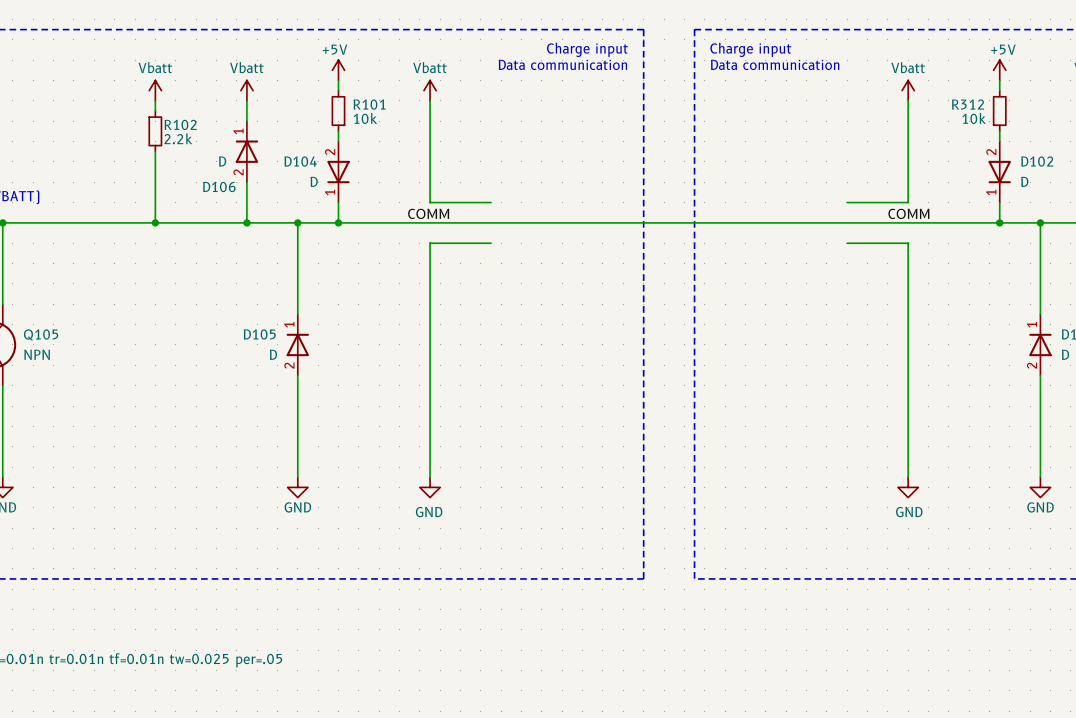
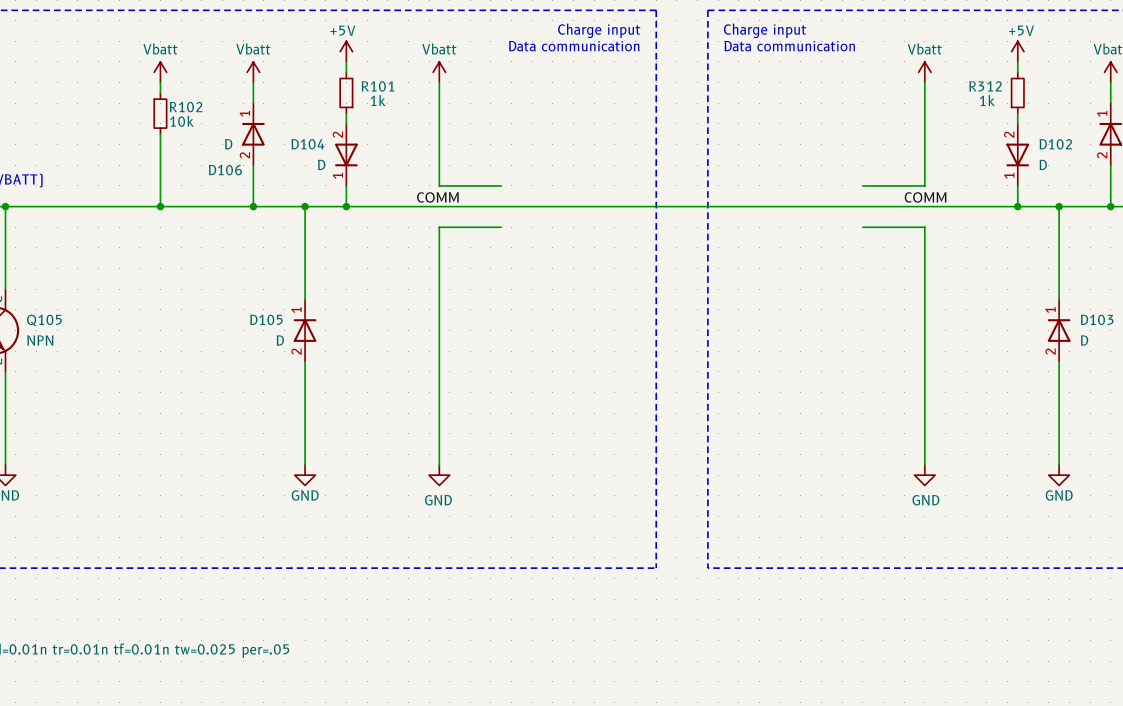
R101 value: 10k (365, 118) -> 1k (378, 100)
R312 value: 10k (974, 118) -> 1k (987, 100)
R102 value: 2.2k (178, 138) -> 10k (181, 121)

